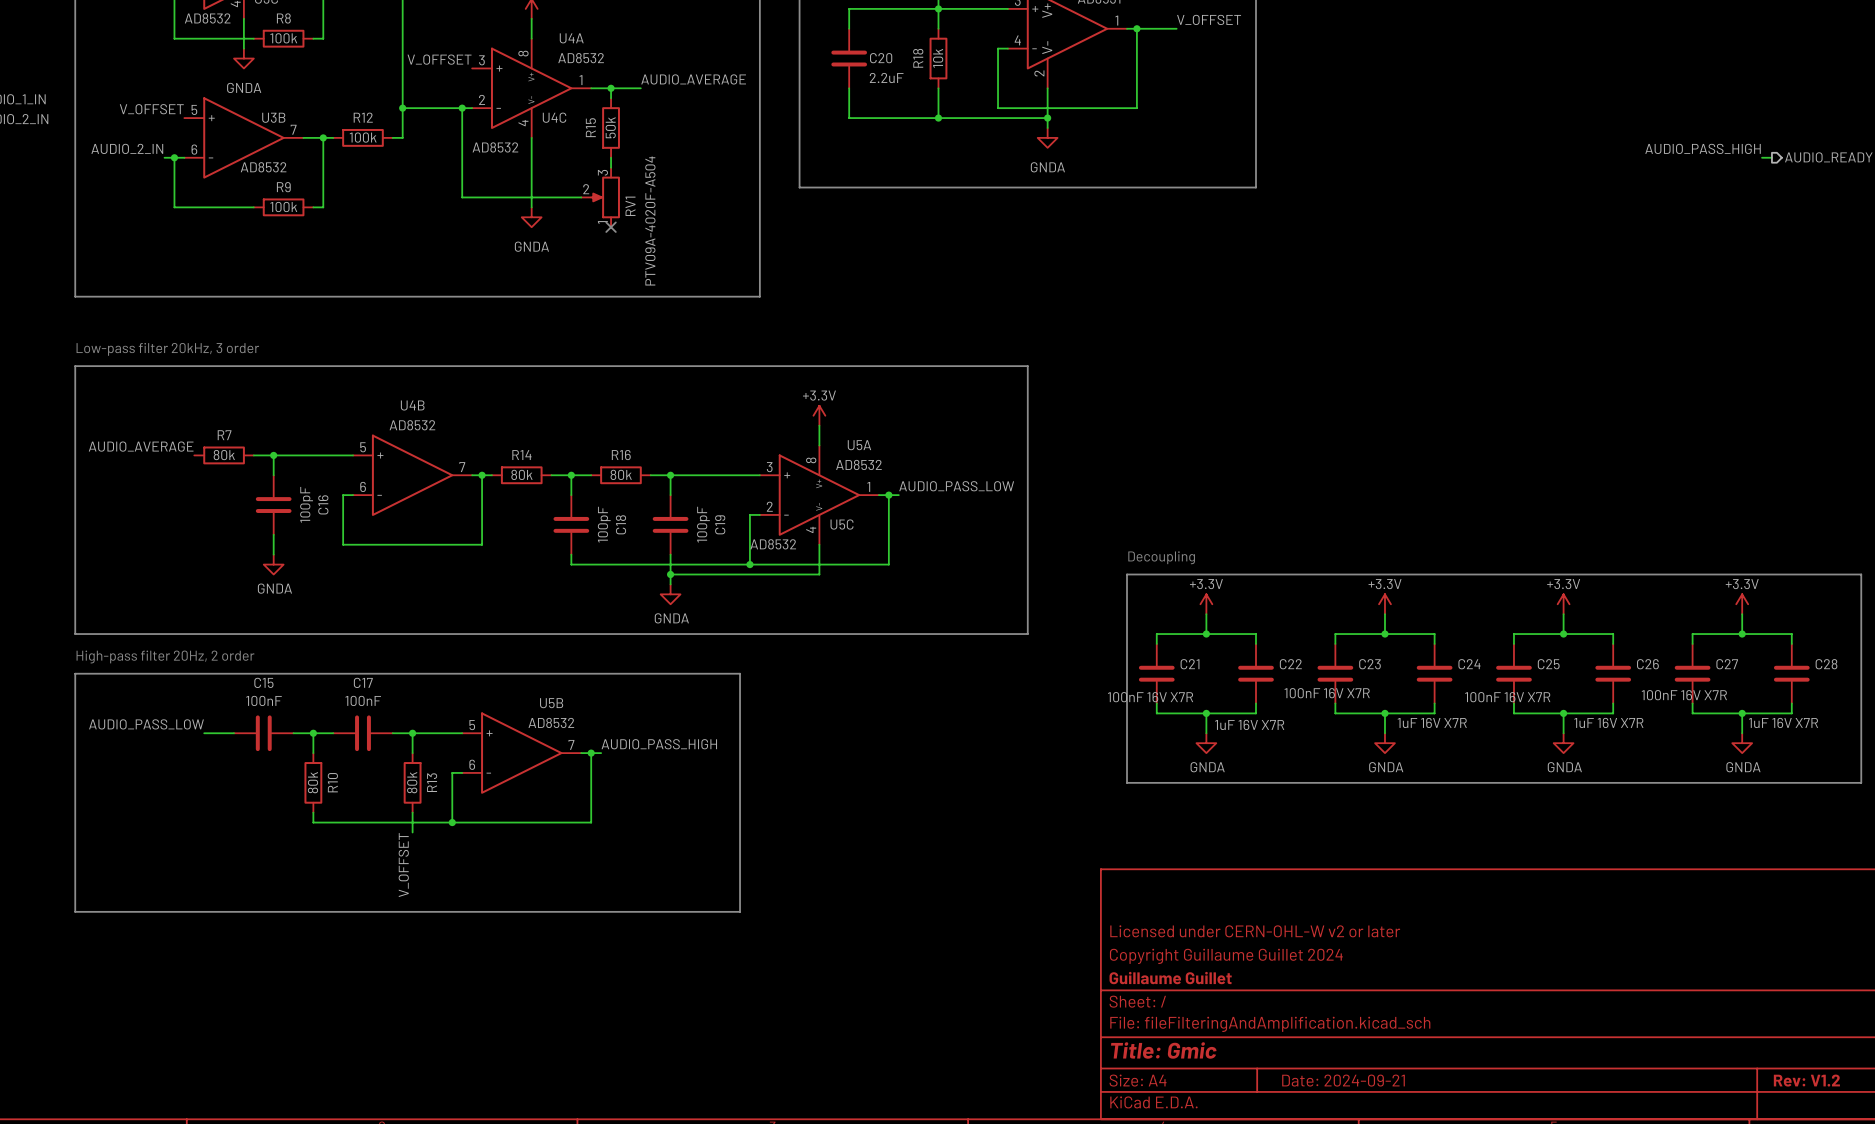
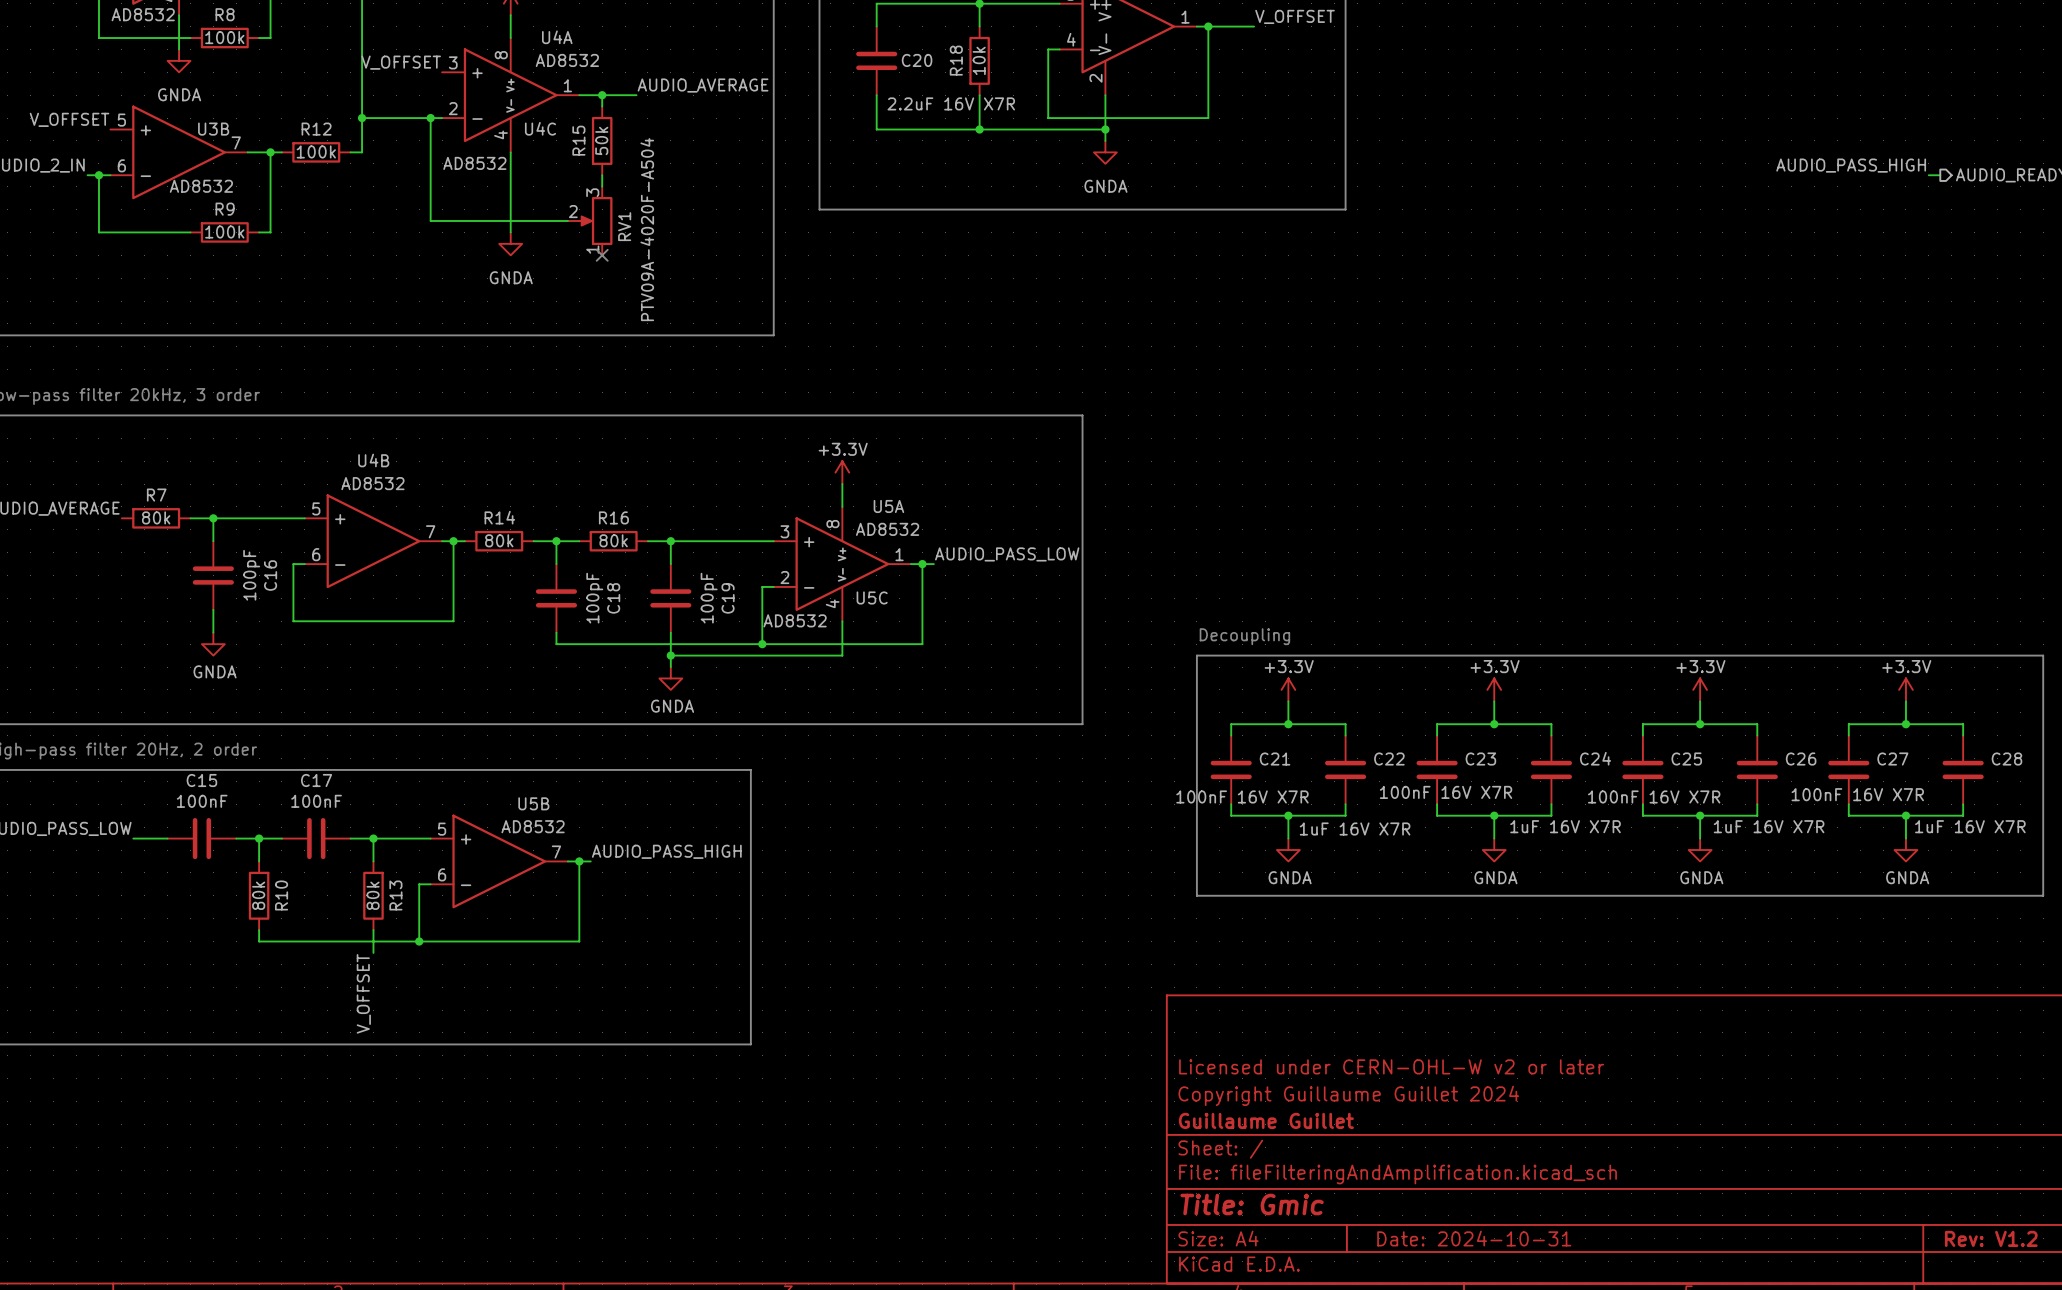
C20 value: 2.2uF (886, 78) -> 2.2uF 16V X7R (951, 103)
title block: Date: 2024-09-21 (1343, 1080) -> Date: 2024-10-31 (1474, 1238)

